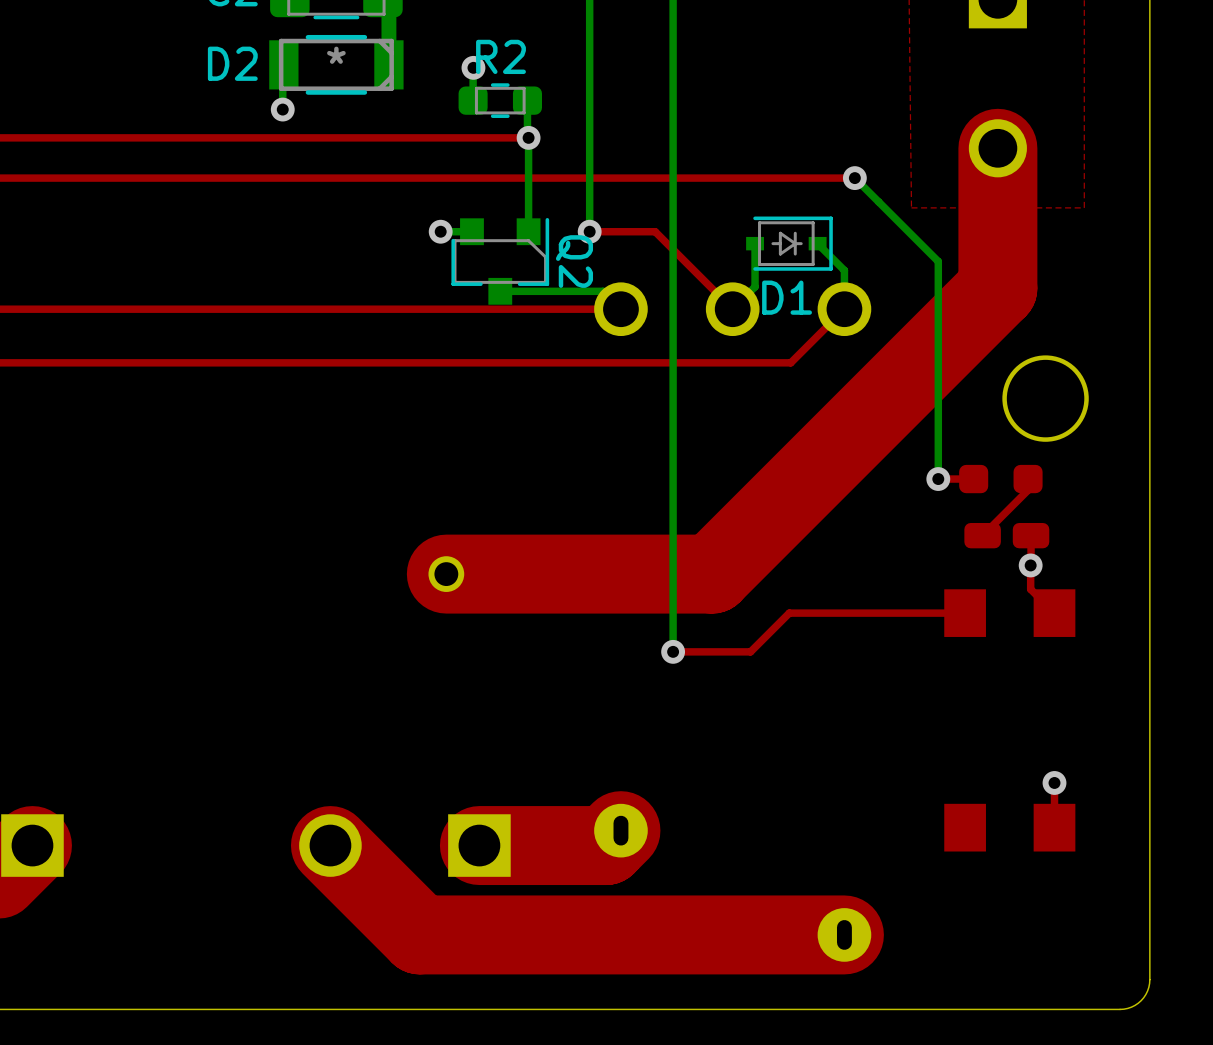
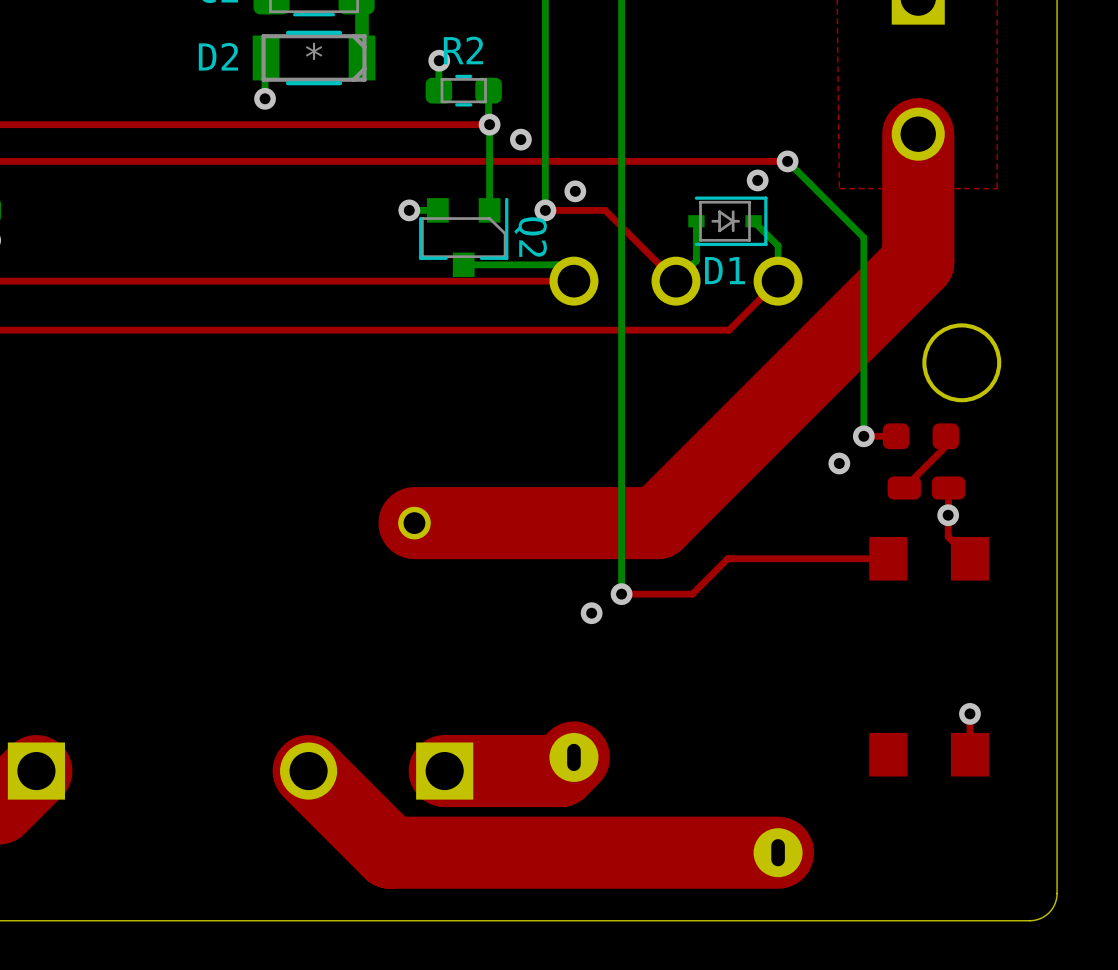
via: none -> (520, 139)
via: none -> (757, 180)
via: none -> (575, 191)
via: none -> (839, 463)
via: none -> (591, 613)

